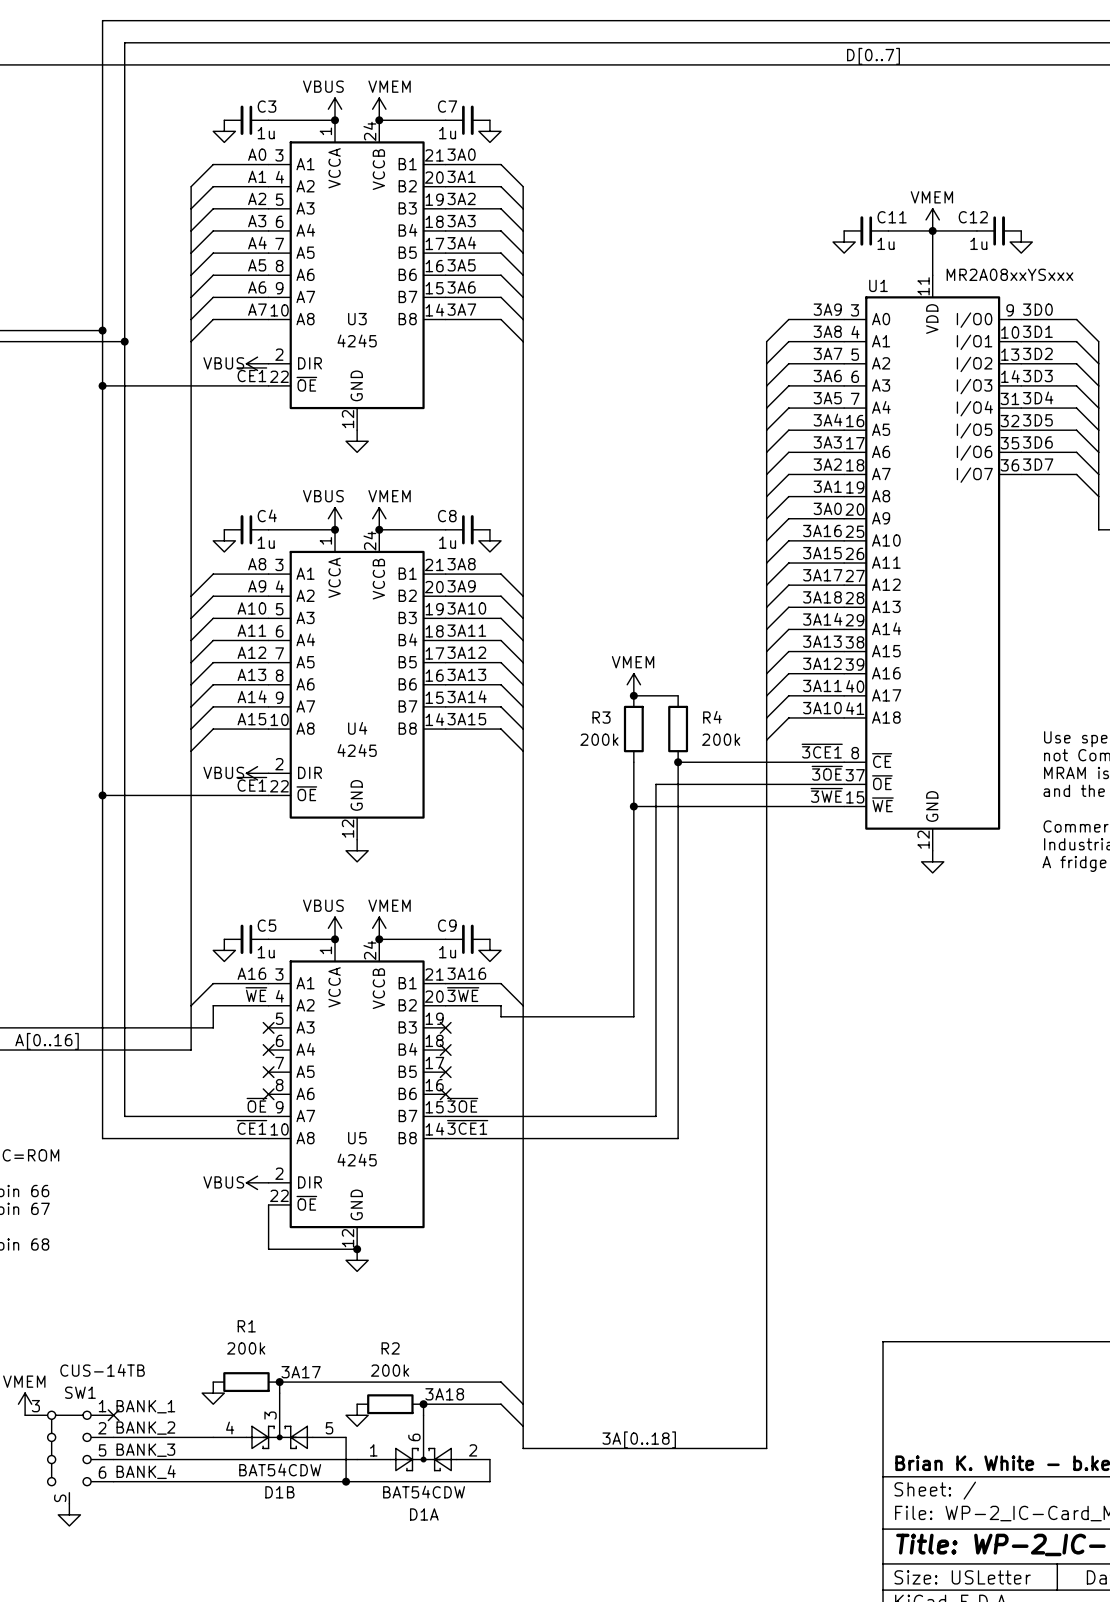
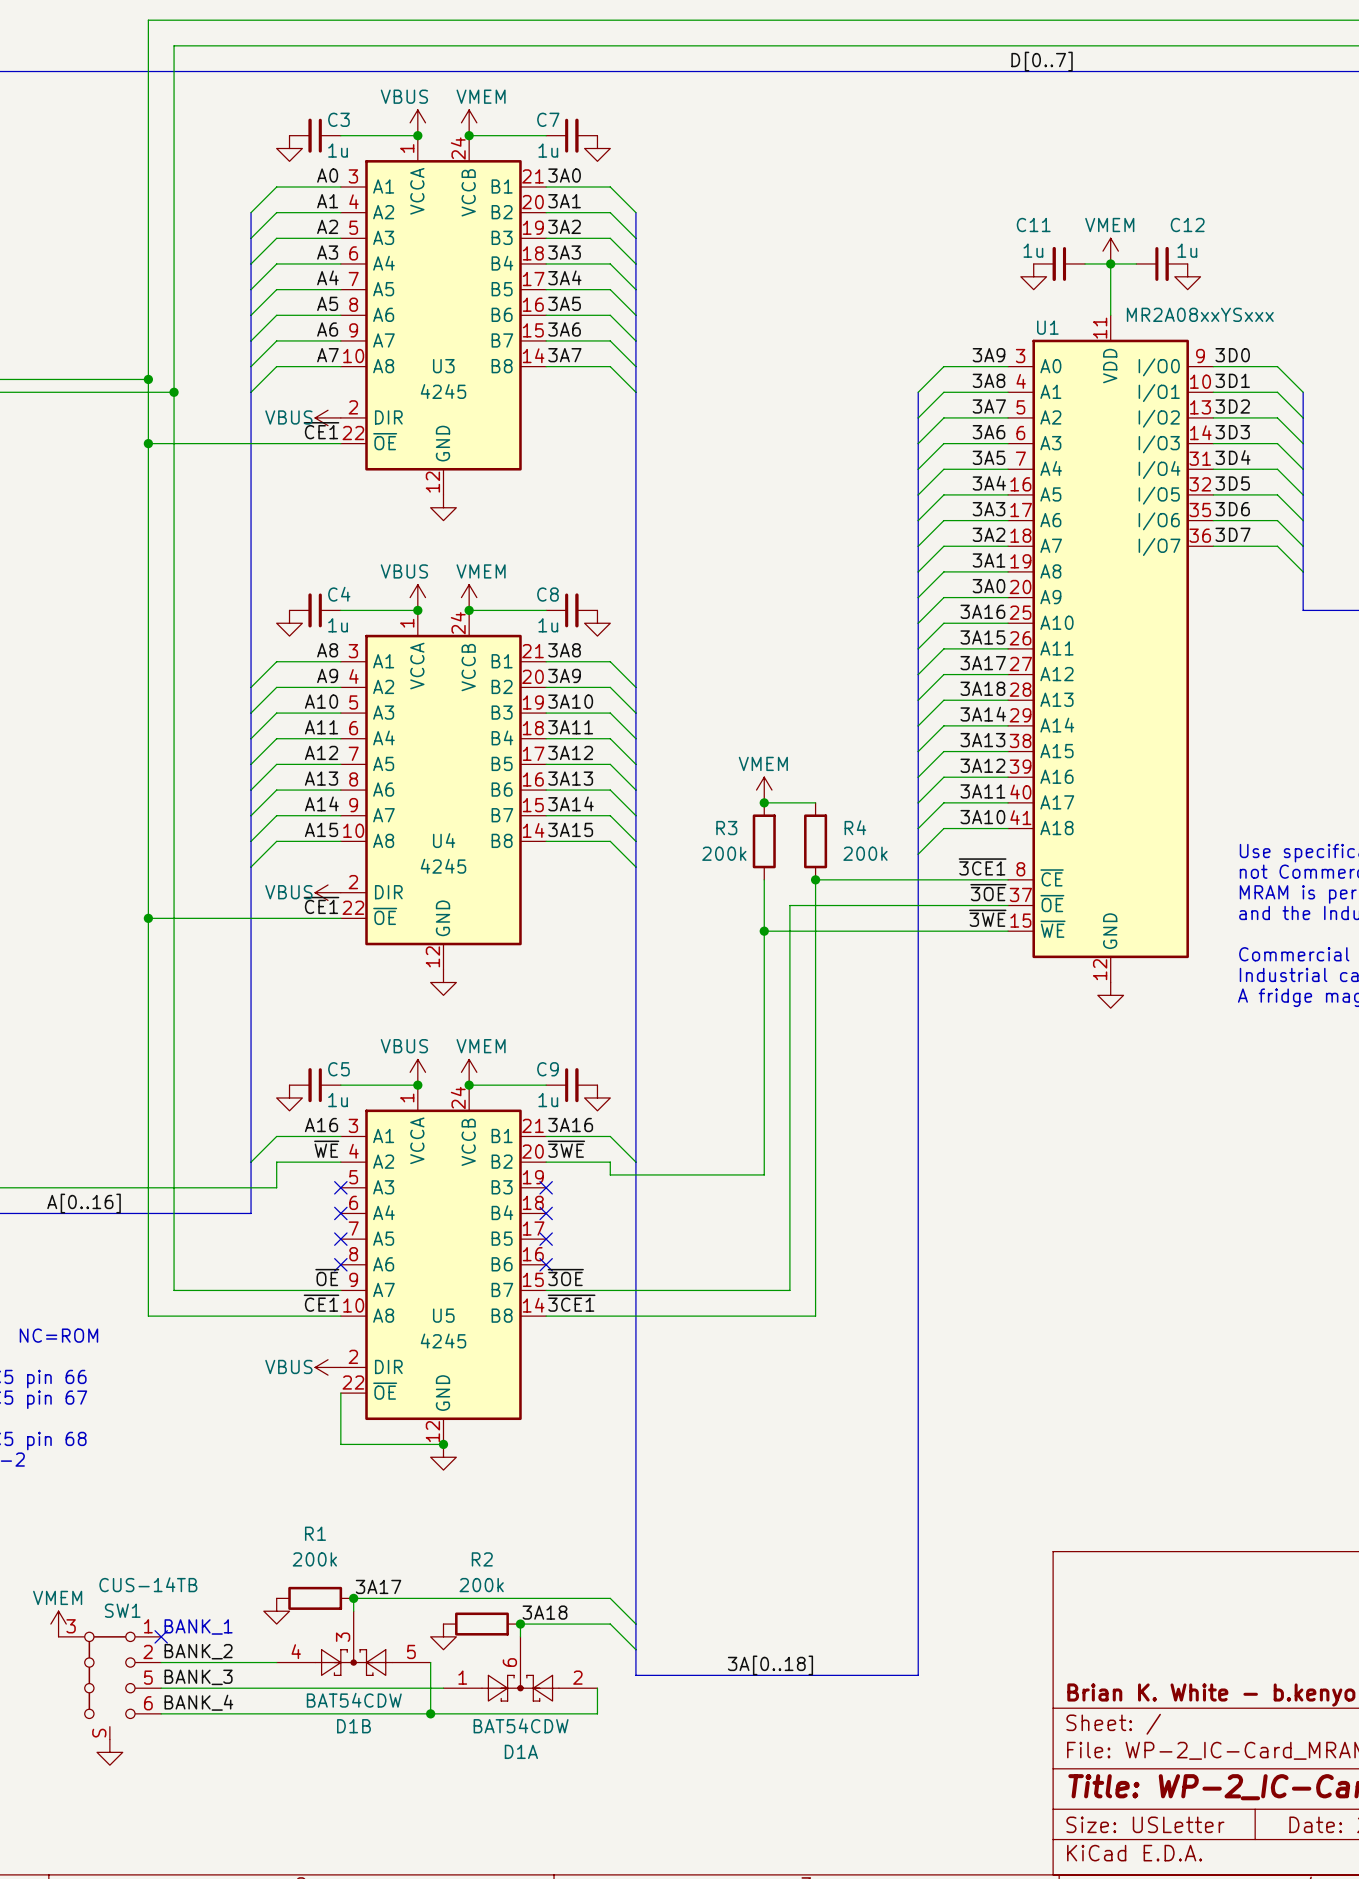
C11 name position: C11 (892, 217) -> C11 (1033, 225)
C12 name position: C12 (973, 217) -> C12 (1187, 225)
C11 position: (866, 230) -> (1059, 263)
C12 position: (999, 230) -> (1162, 263)
power symbol position: (844, 242) -> (1033, 276)
power symbol position: (1021, 242) -> (1187, 276)
C11 value position: 1u (886, 243) -> 1u (1033, 250)
C12 value position: 1u (978, 243) -> 1u (1187, 250)

